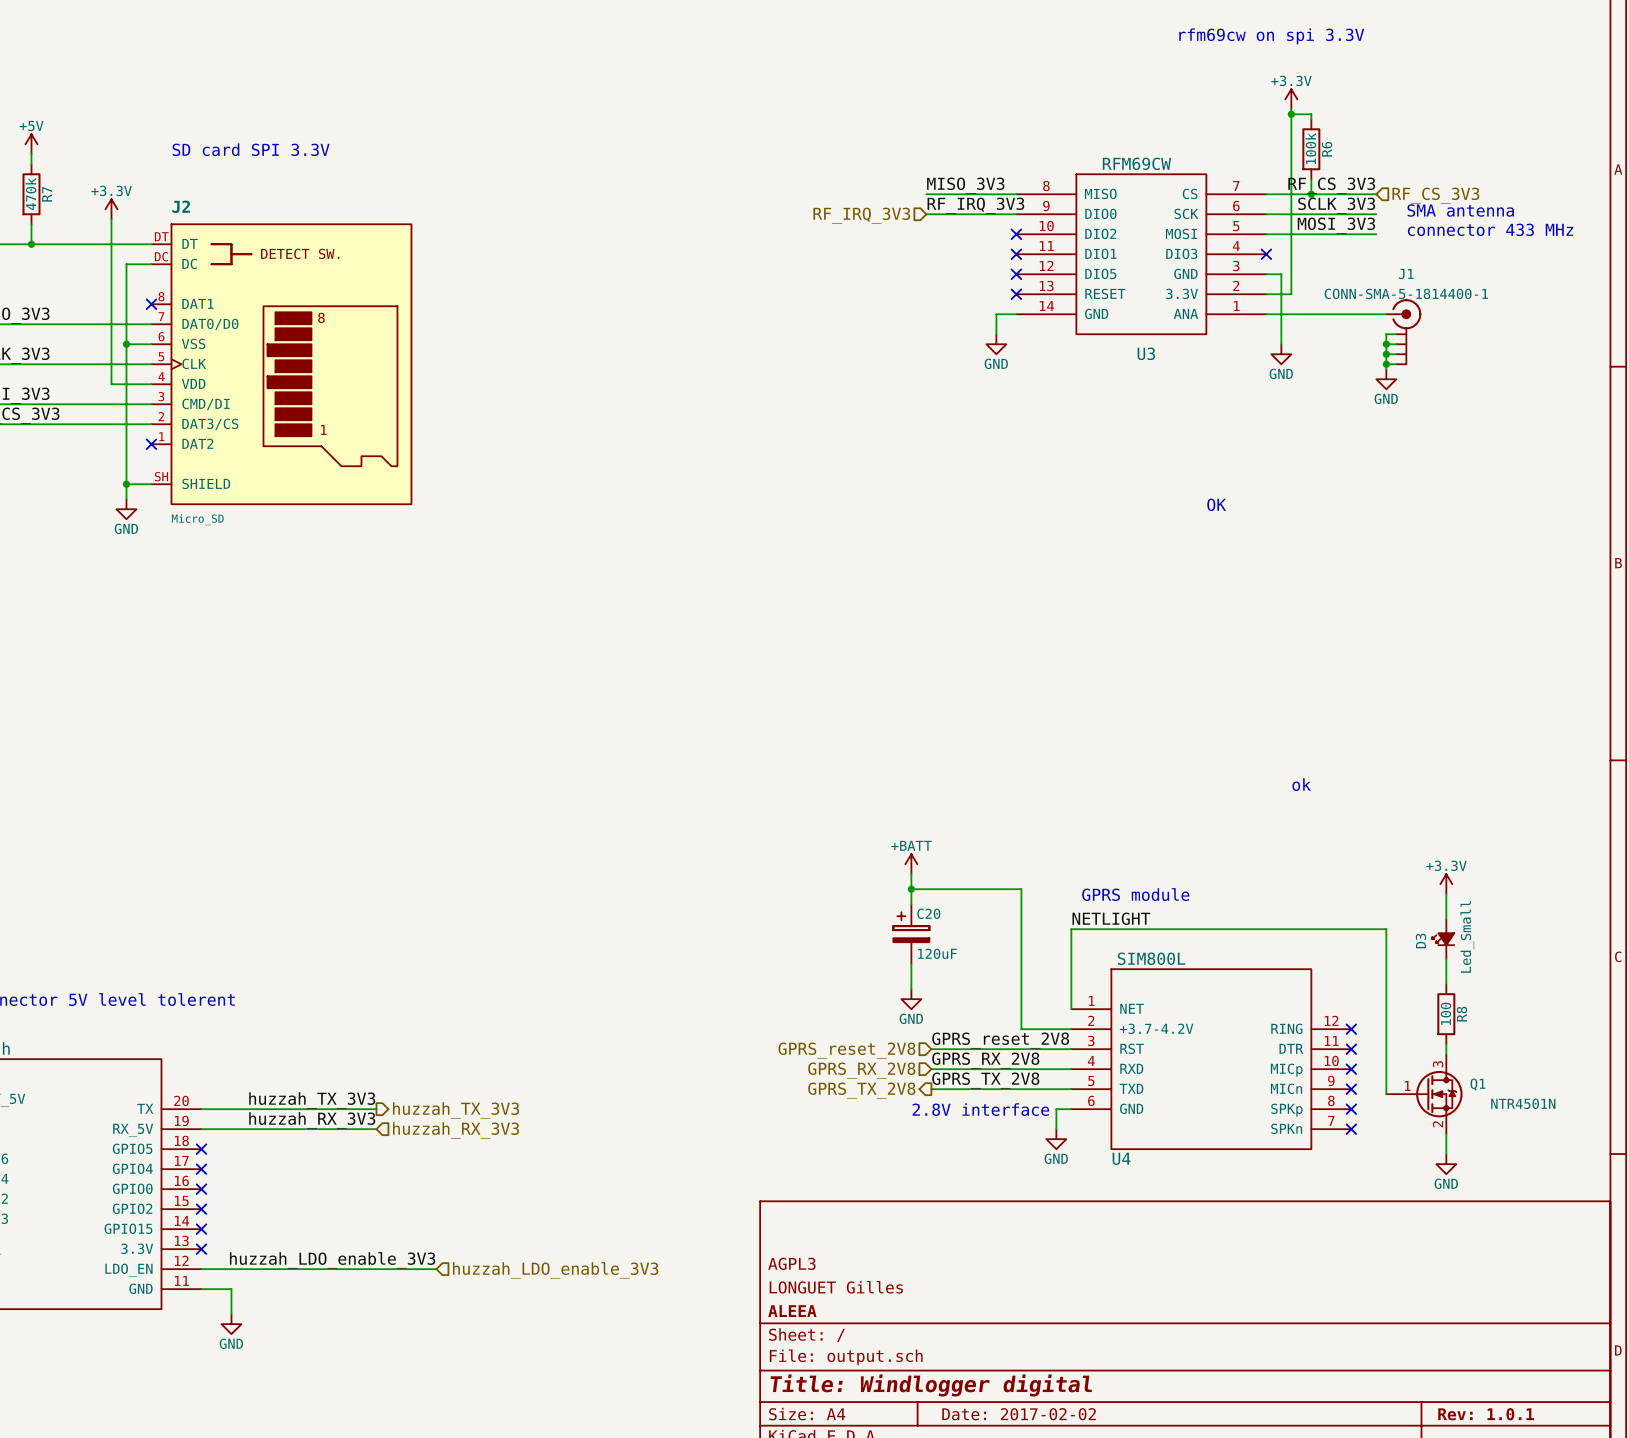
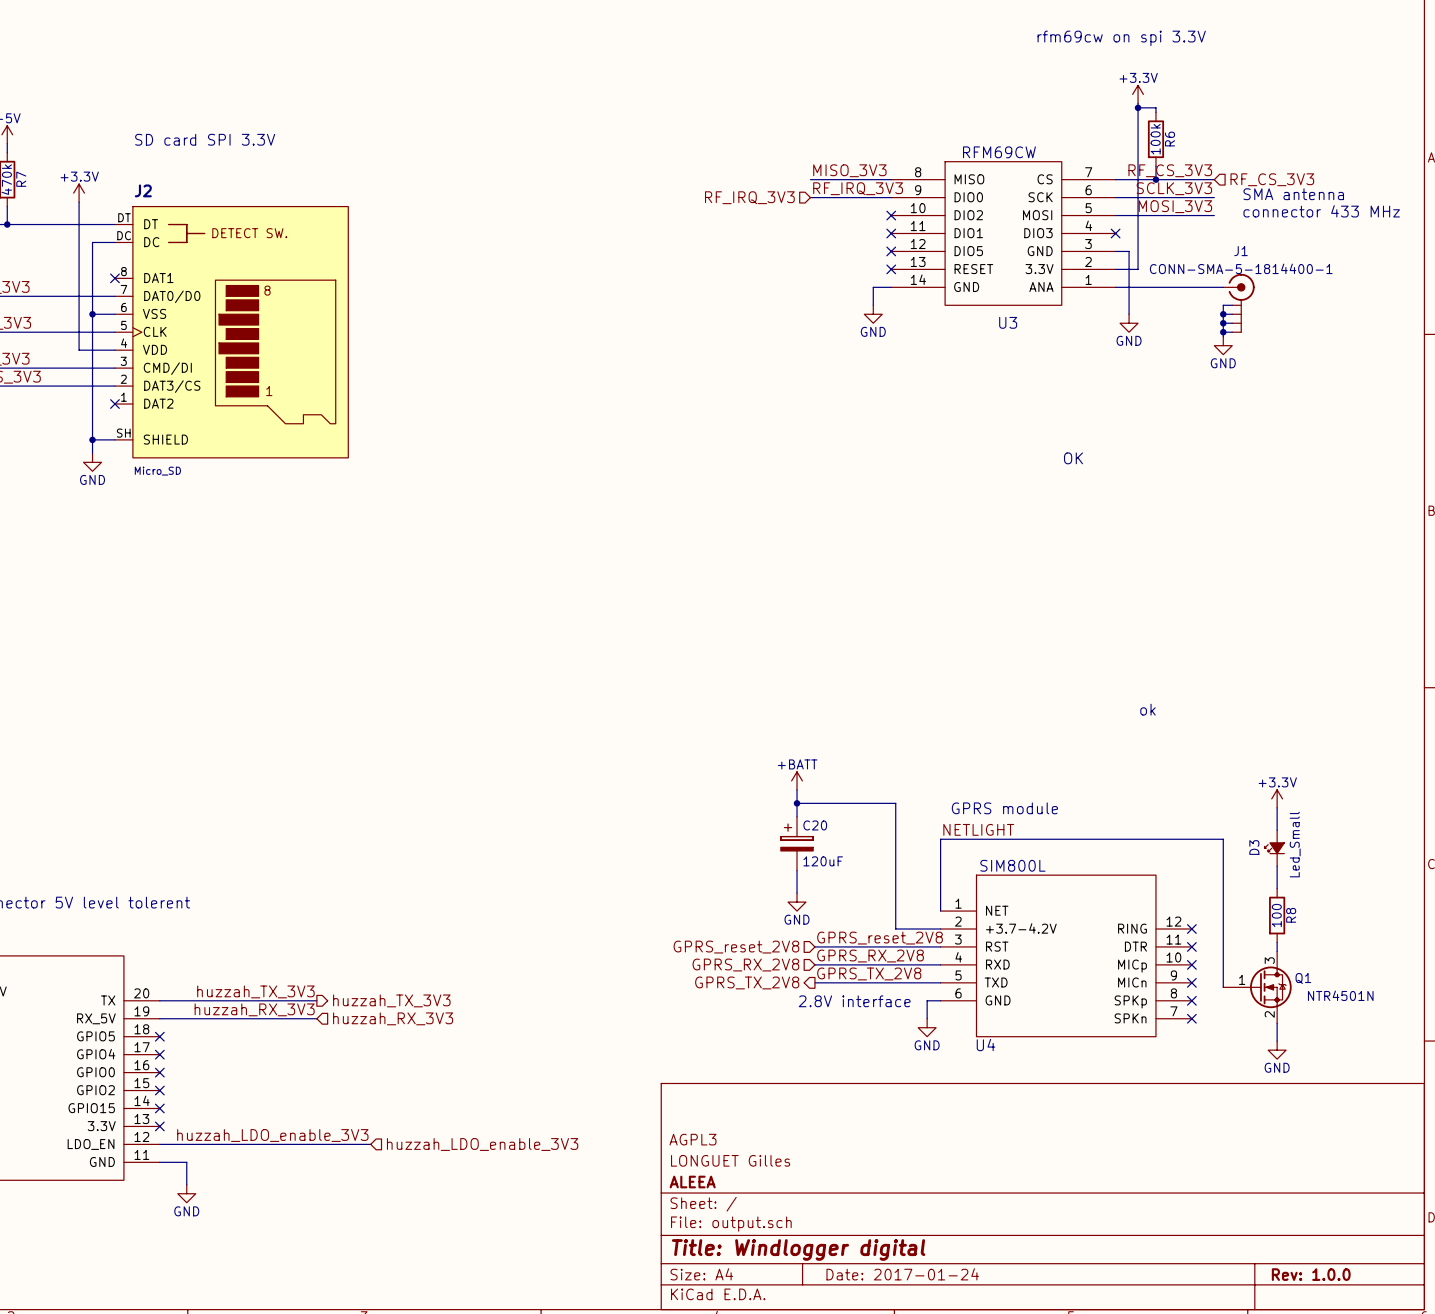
title block: Date: 2017-02-02 (1019, 1414) -> Date: 2017-01-24 (902, 1274)
title block: Rev: 1.0.1 (1486, 1414) -> Rev: 1.0.0 (1311, 1274)

